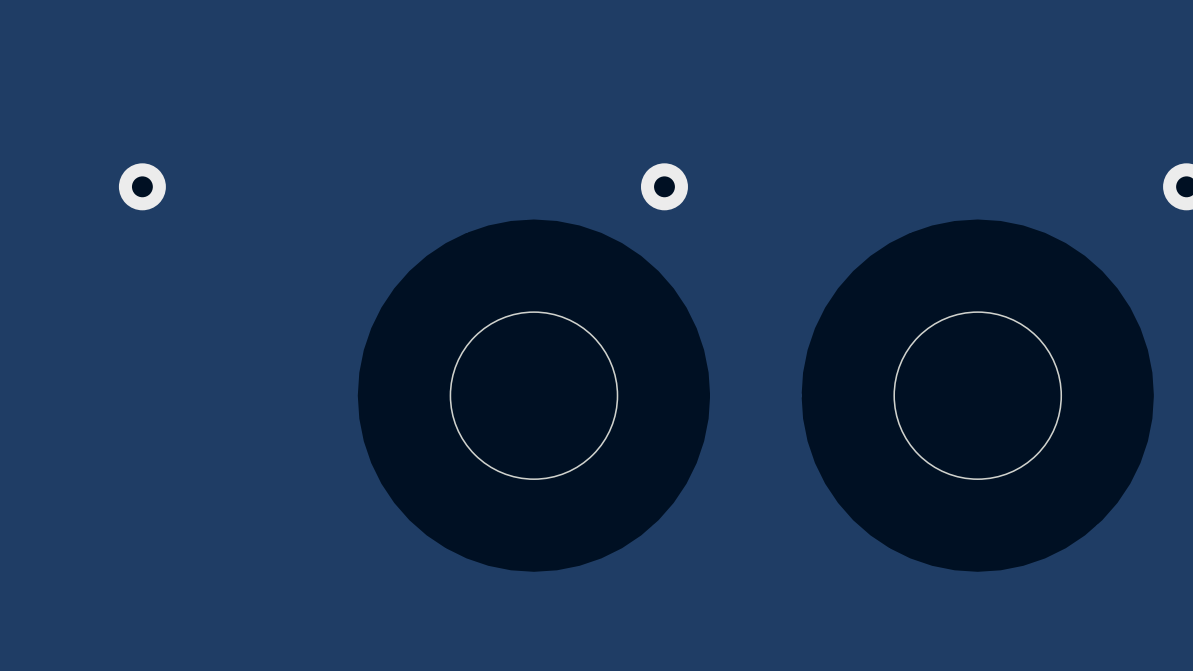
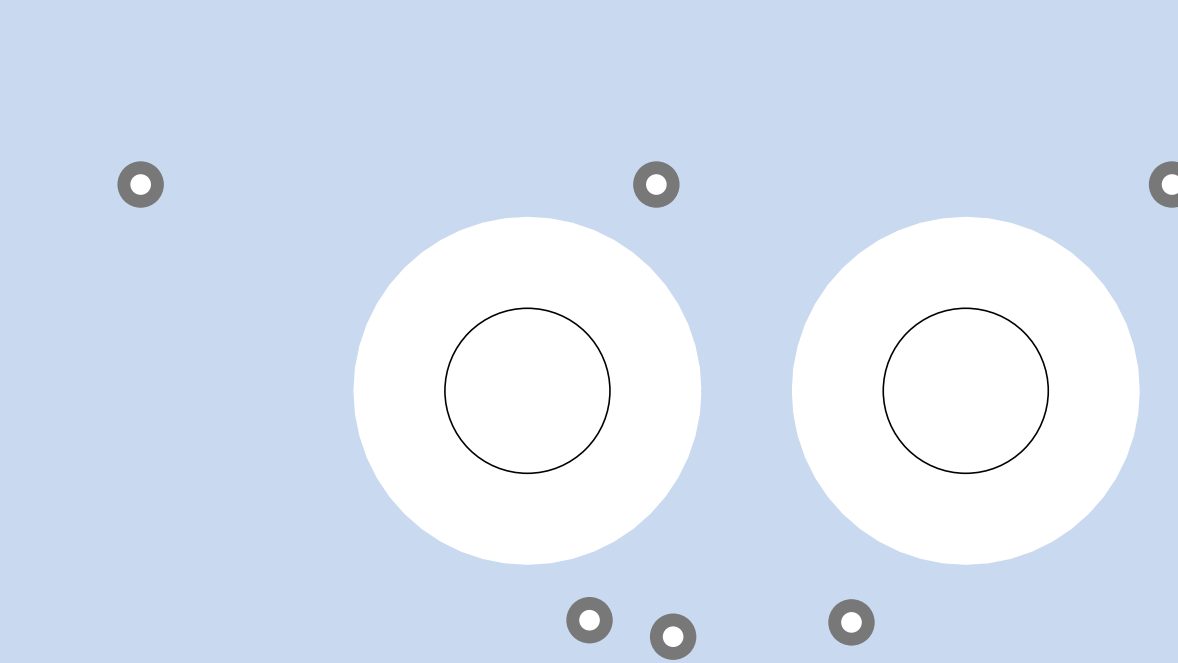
via: none -> (589, 620)
via: none -> (851, 622)
via: none -> (673, 636)

